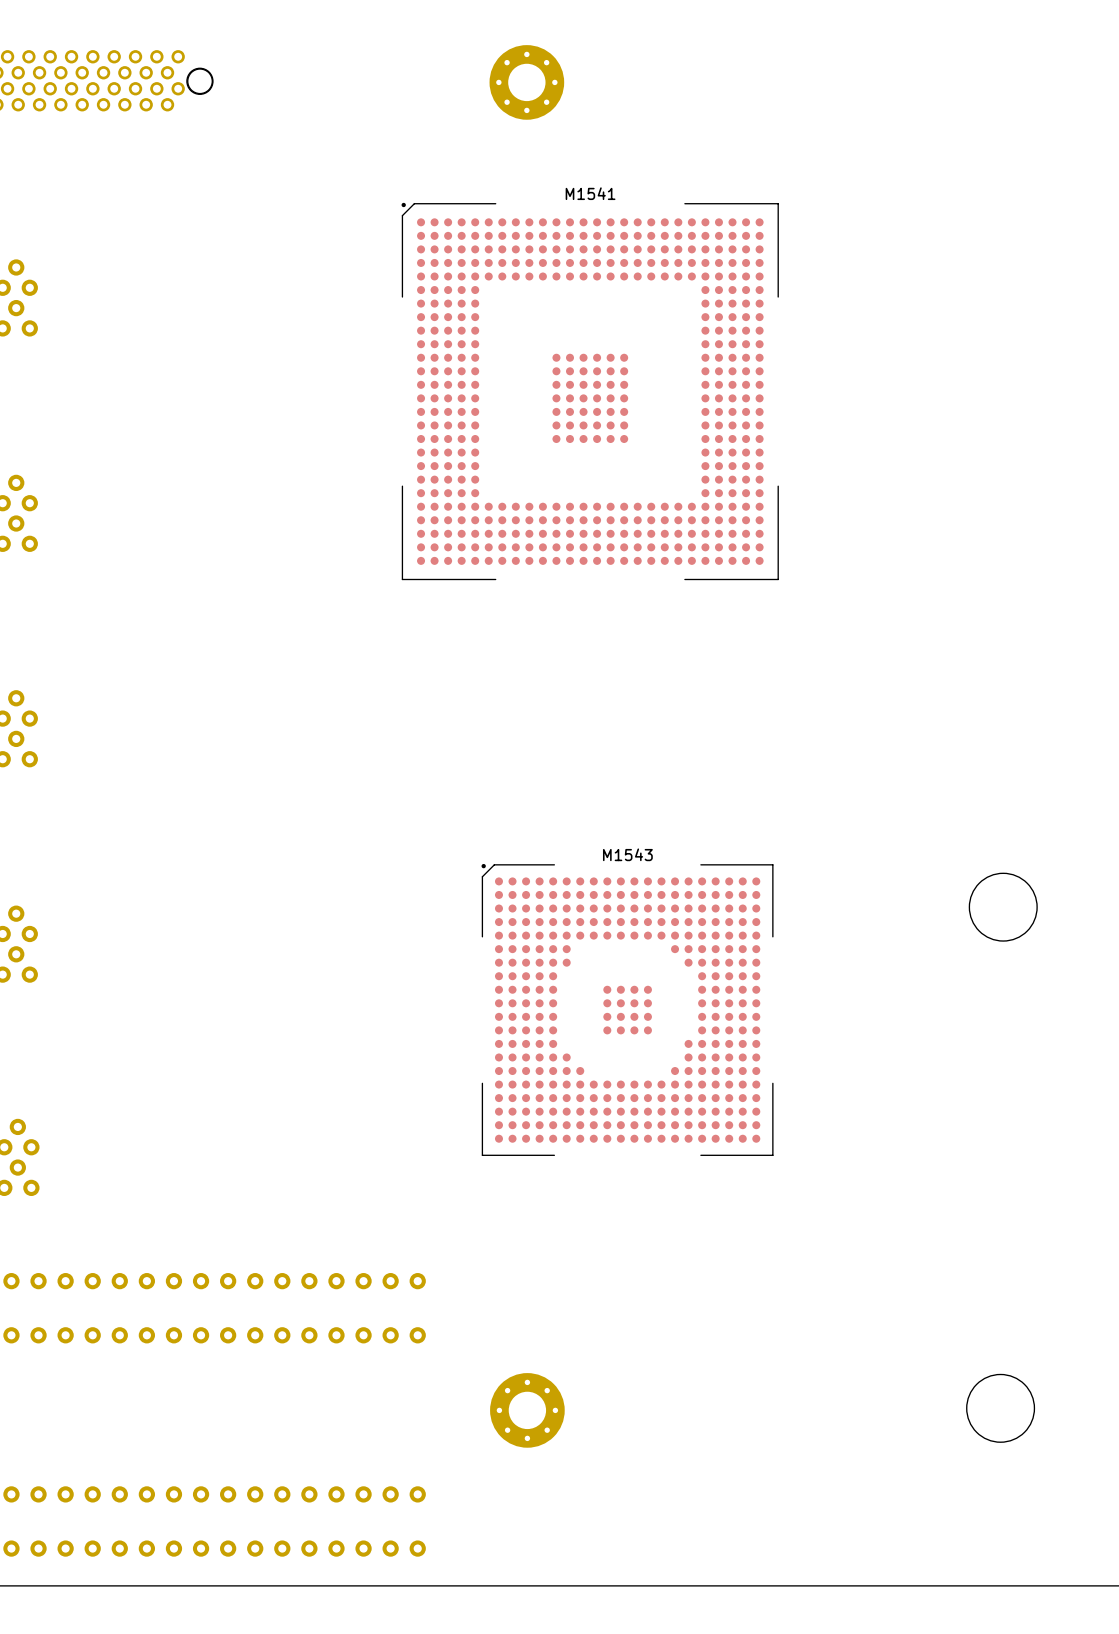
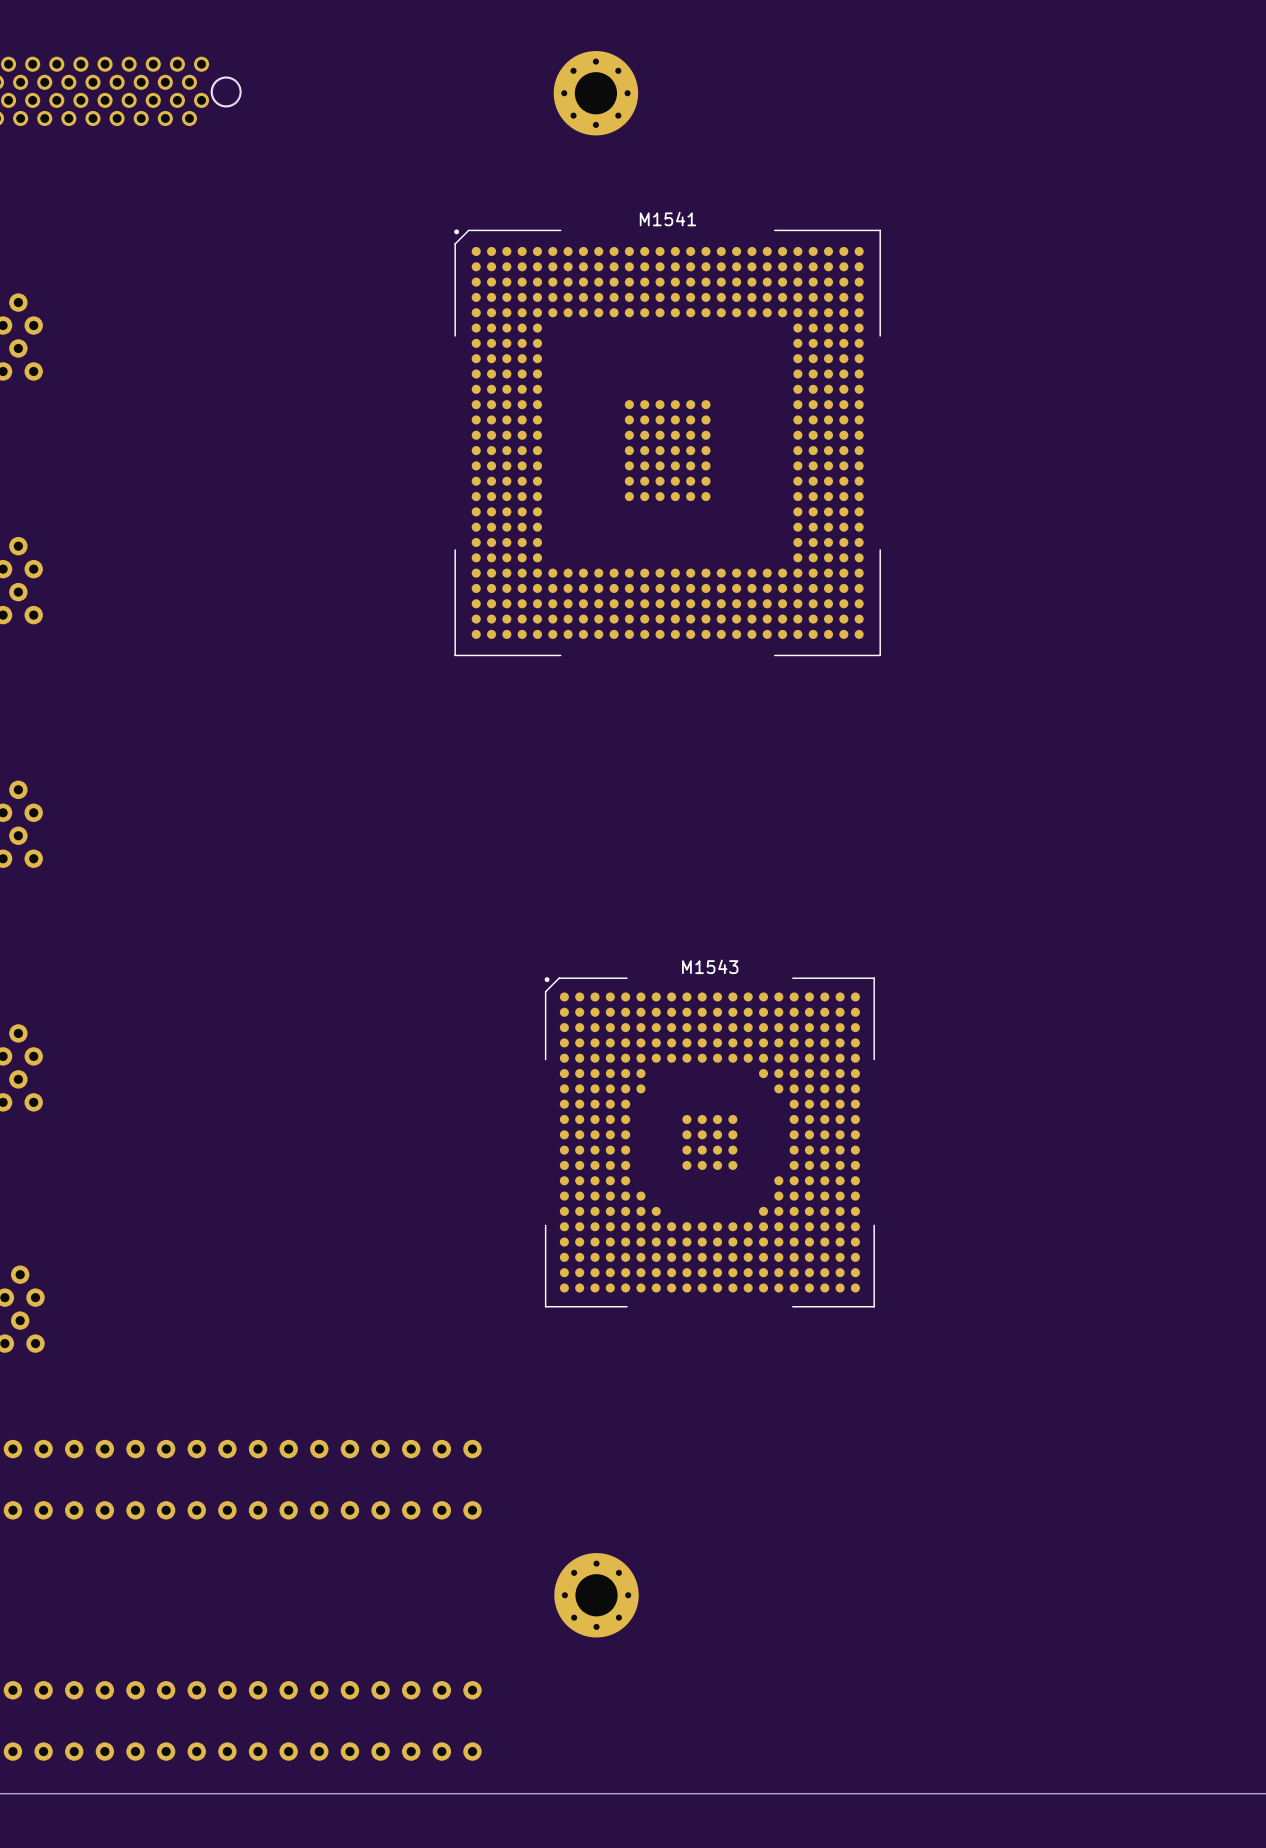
round board edge: [969, 873, 1038, 942] -> none
round board edge: [966, 1374, 1035, 1443] -> none

